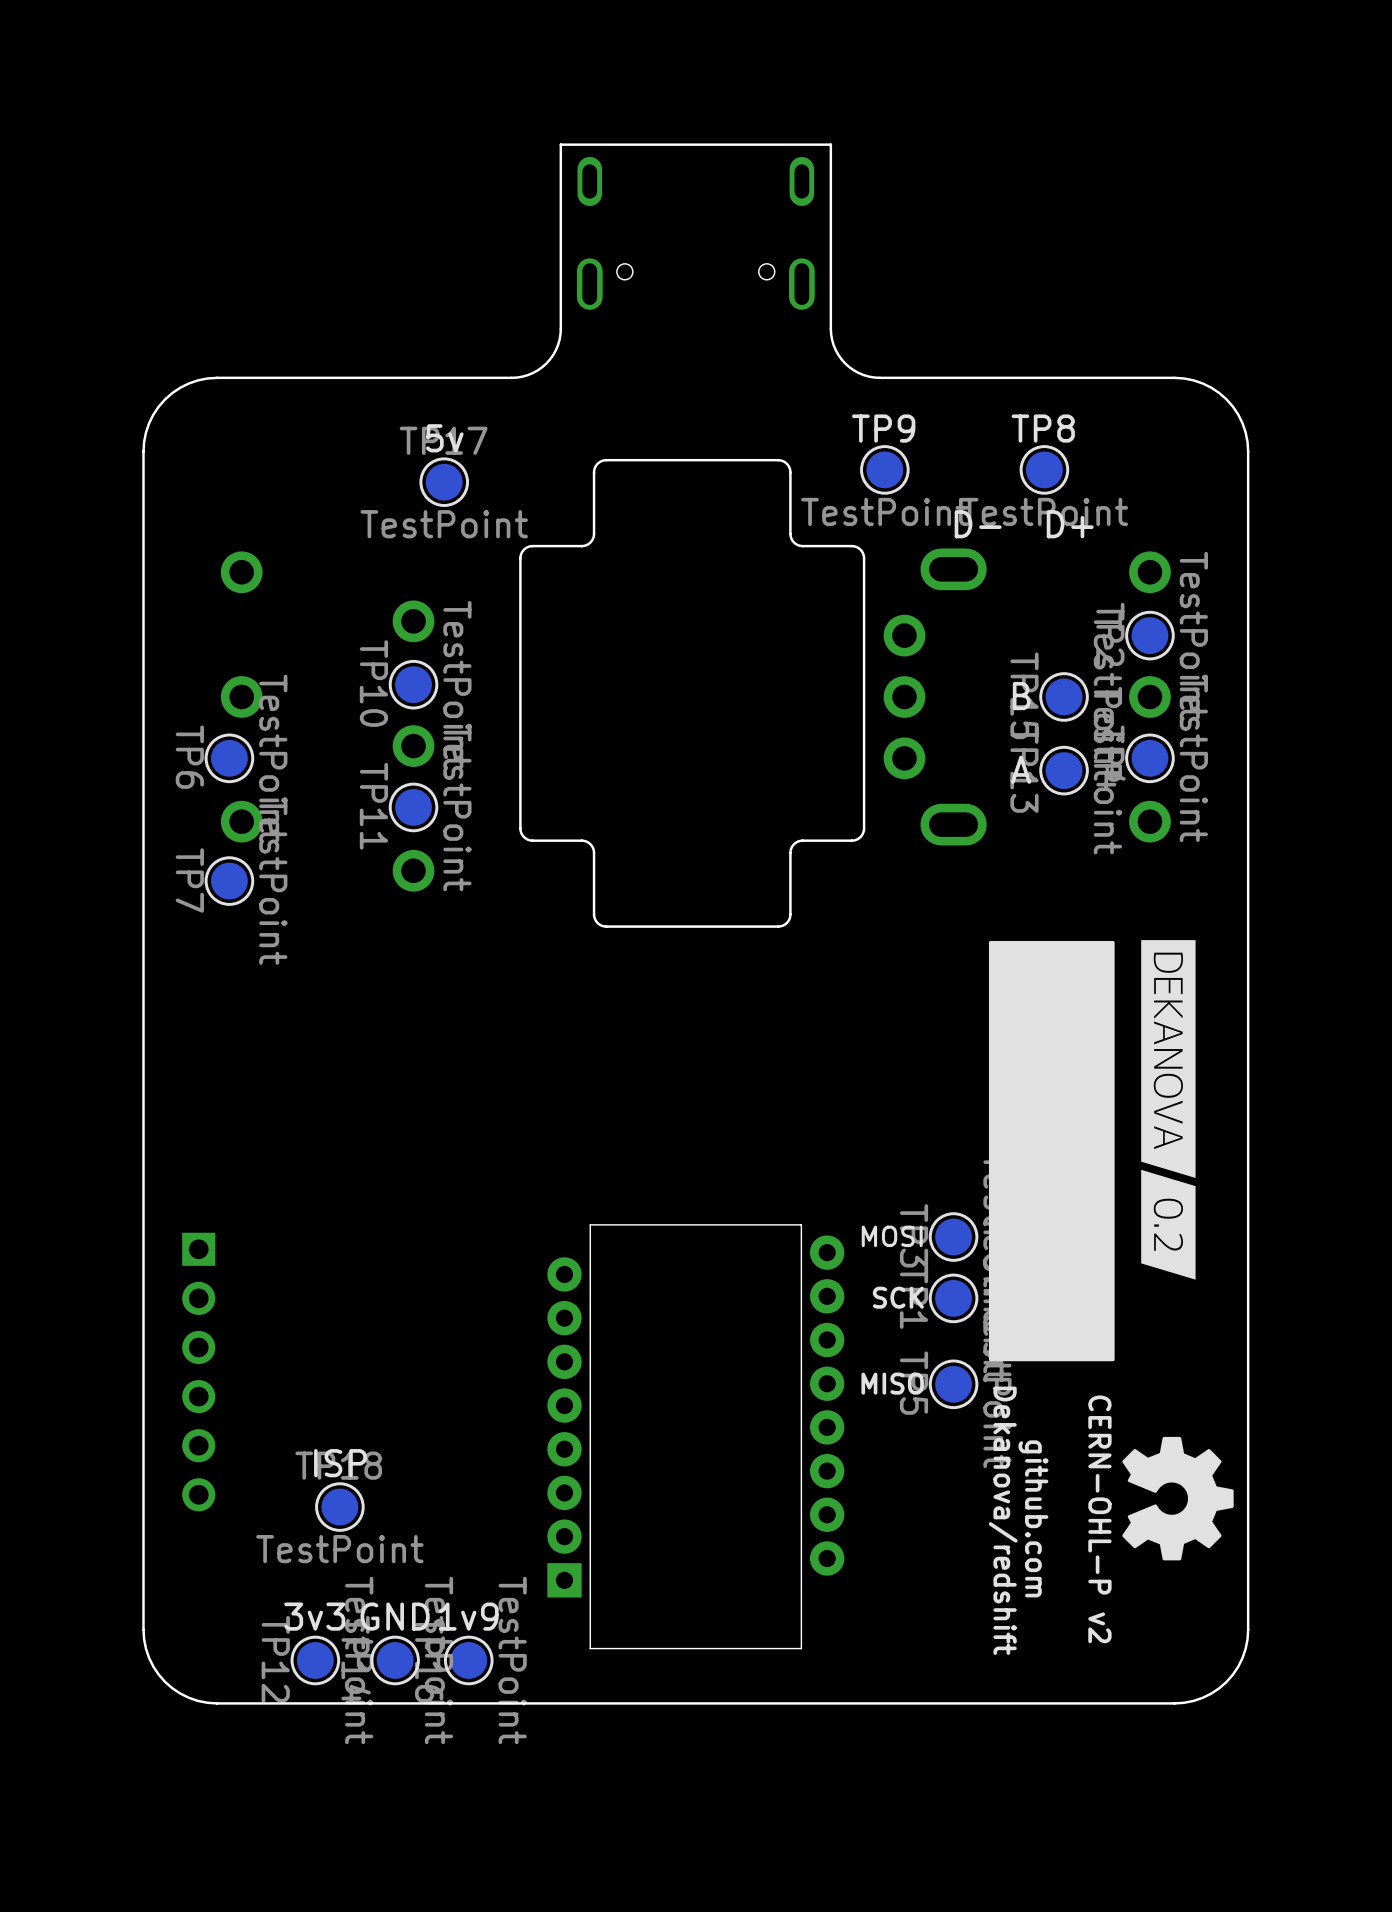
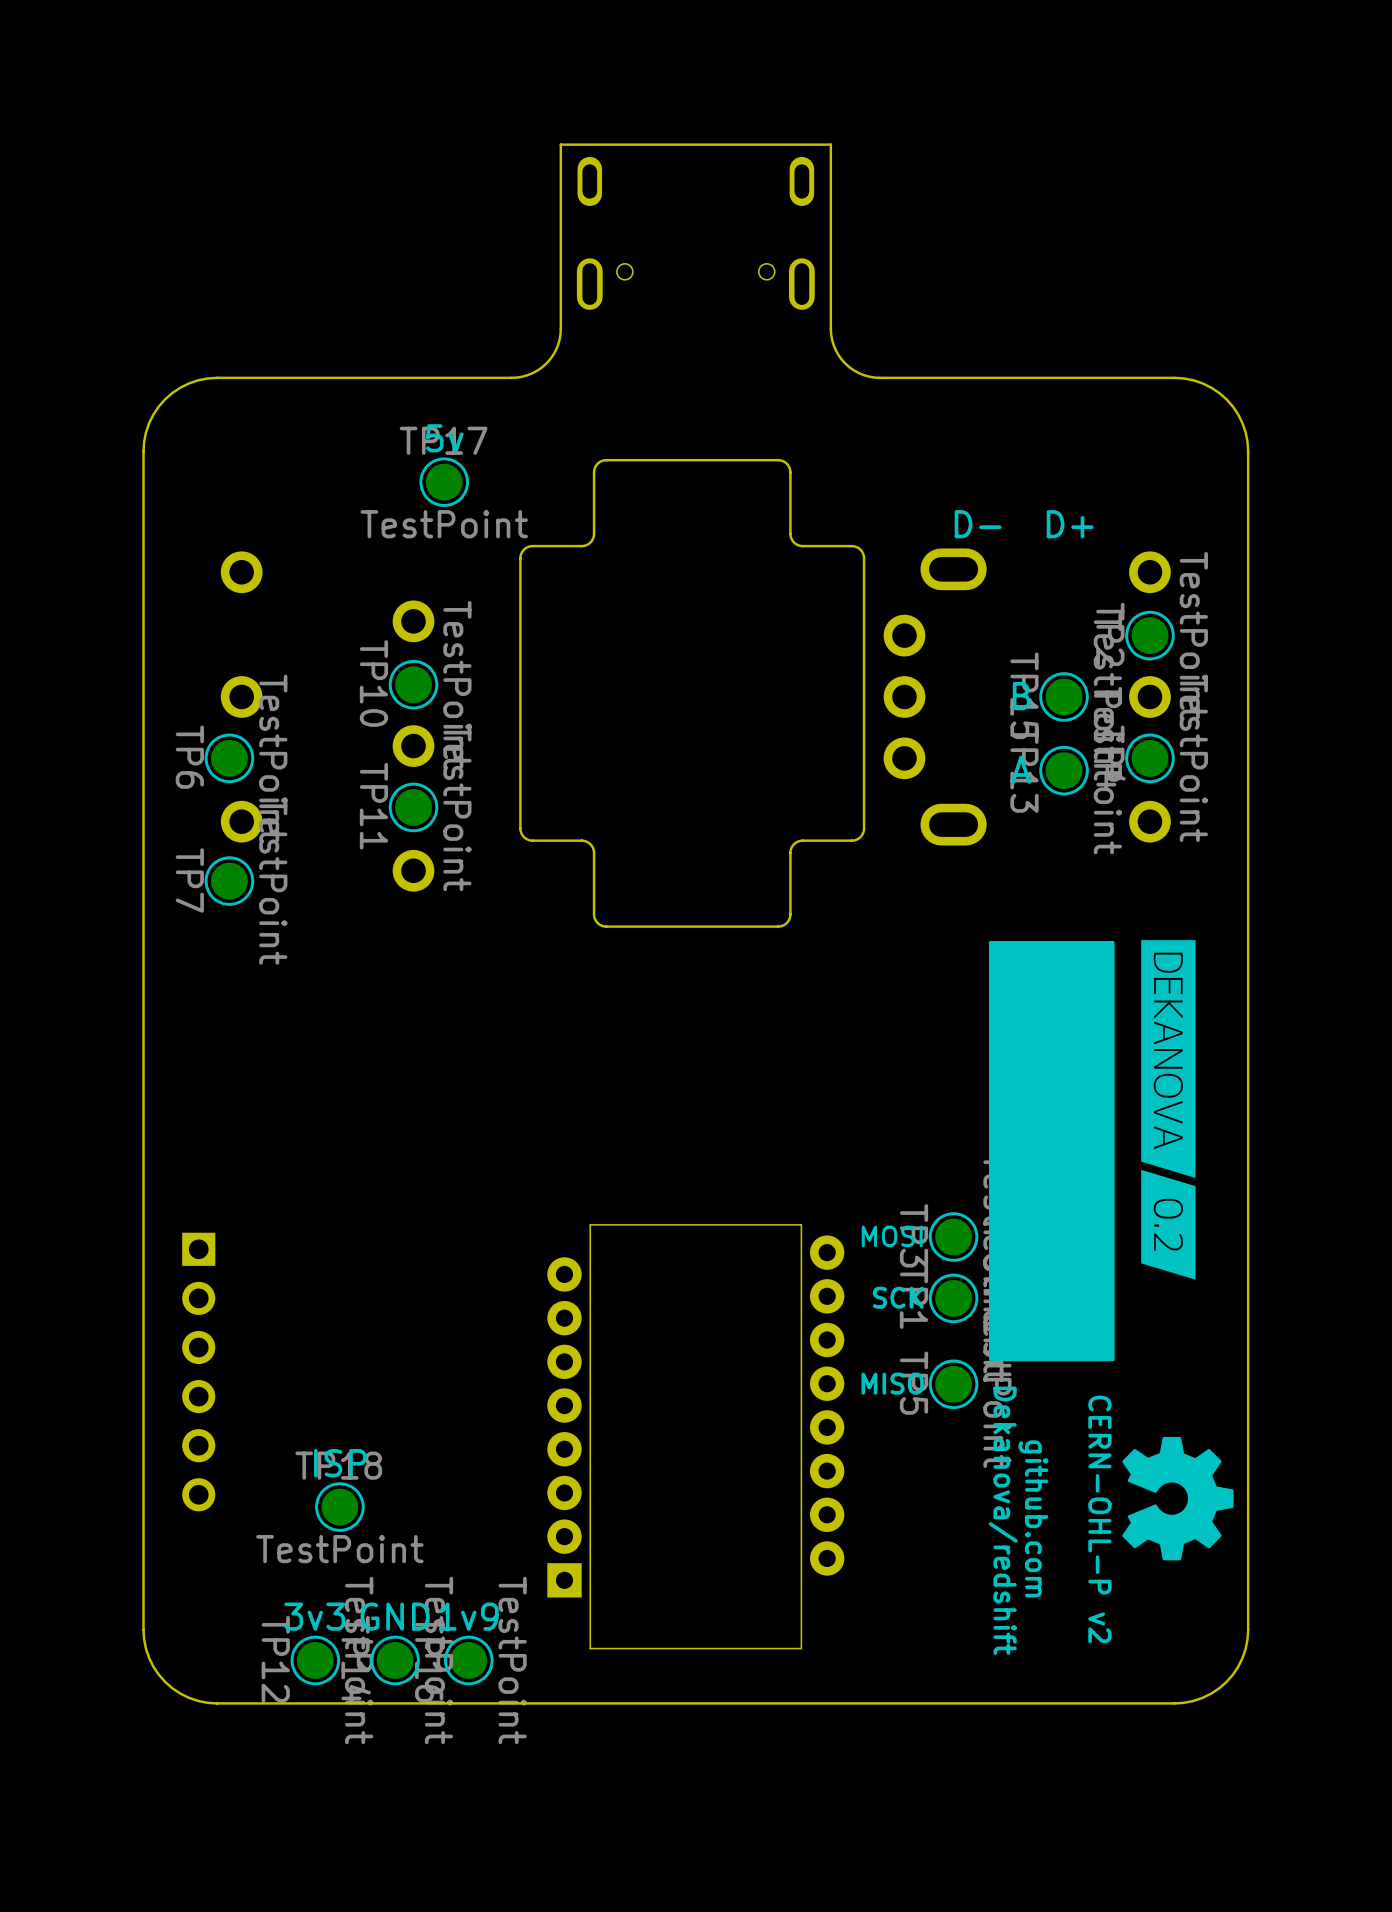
TP9: TestPoint (884, 469) -> none
TP8: TestPoint (1044, 469) -> none

